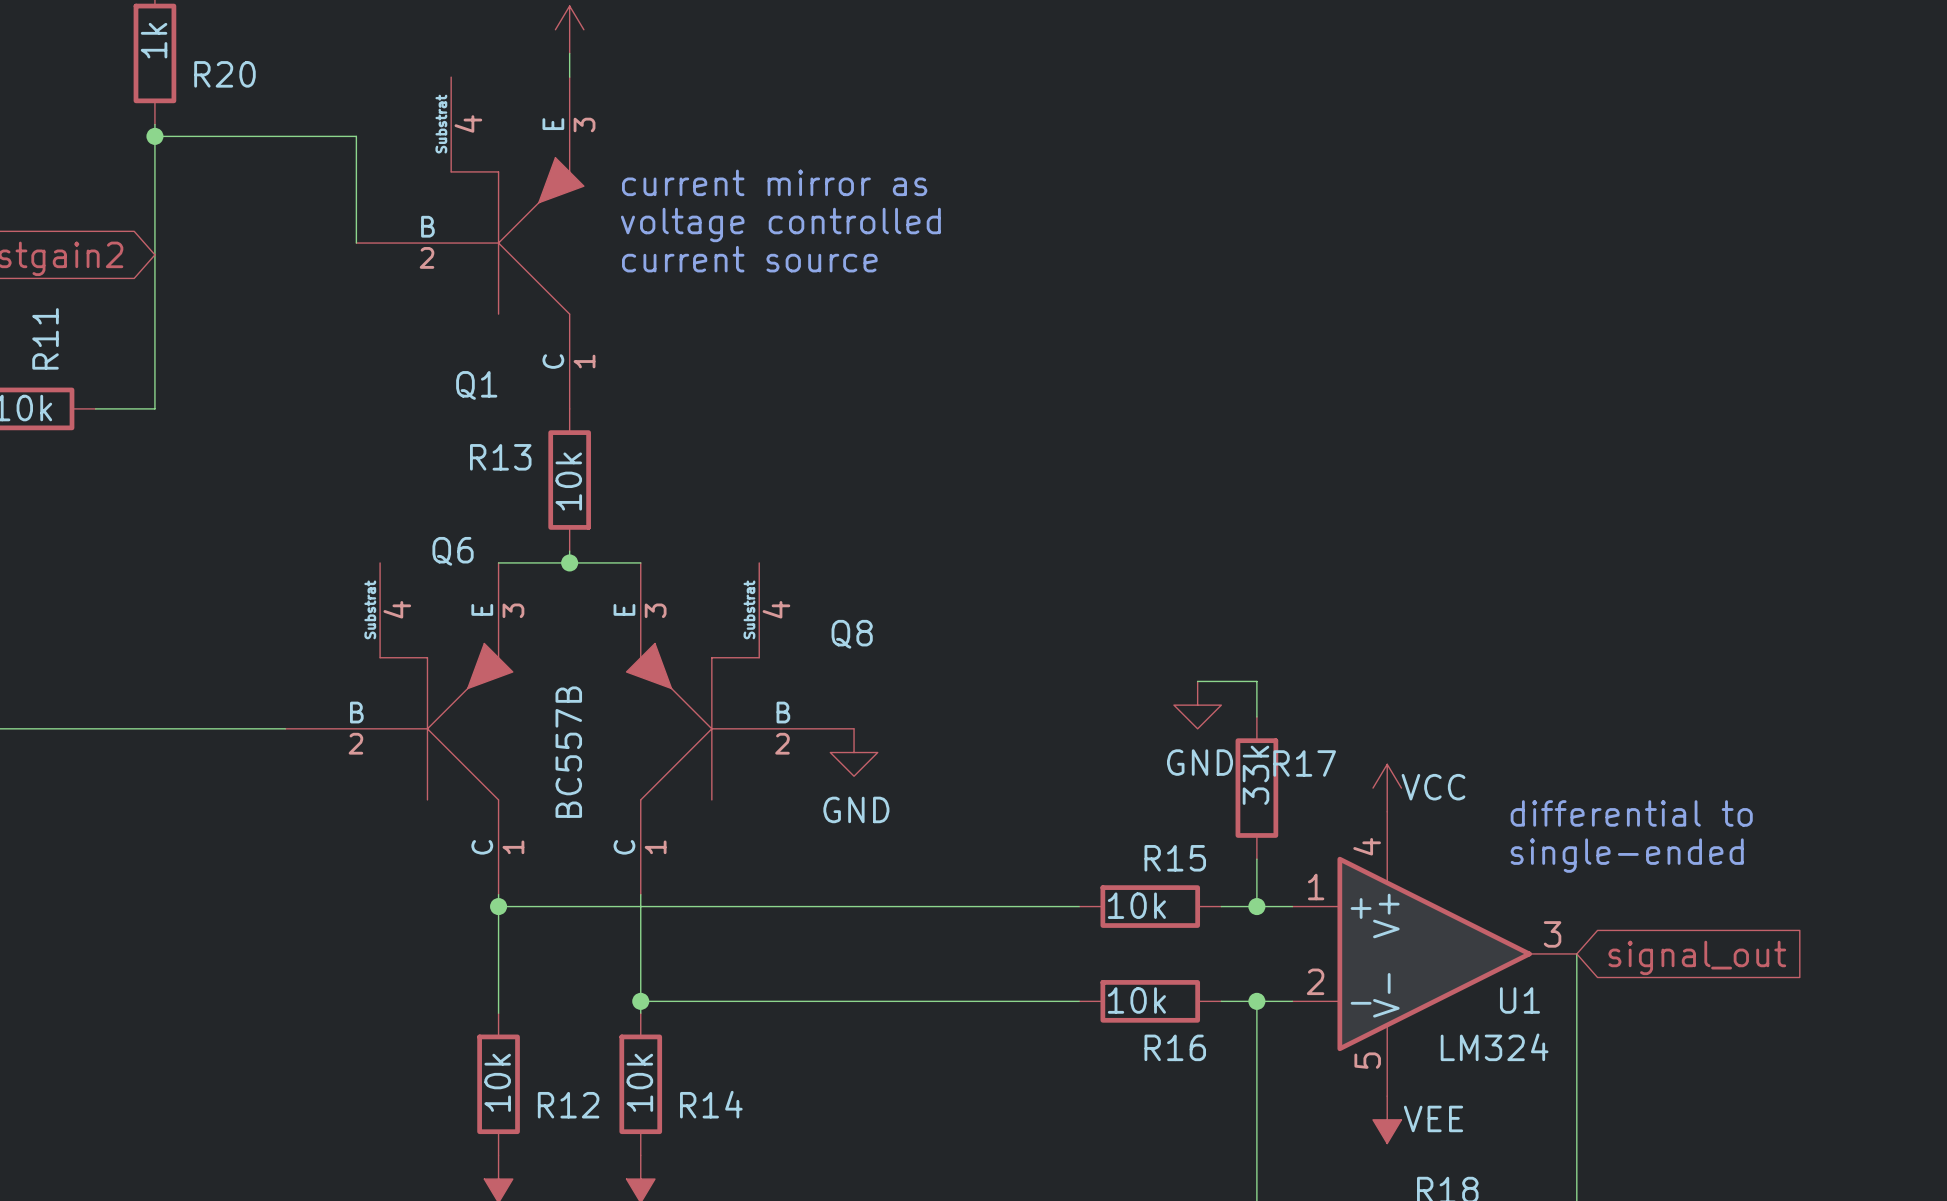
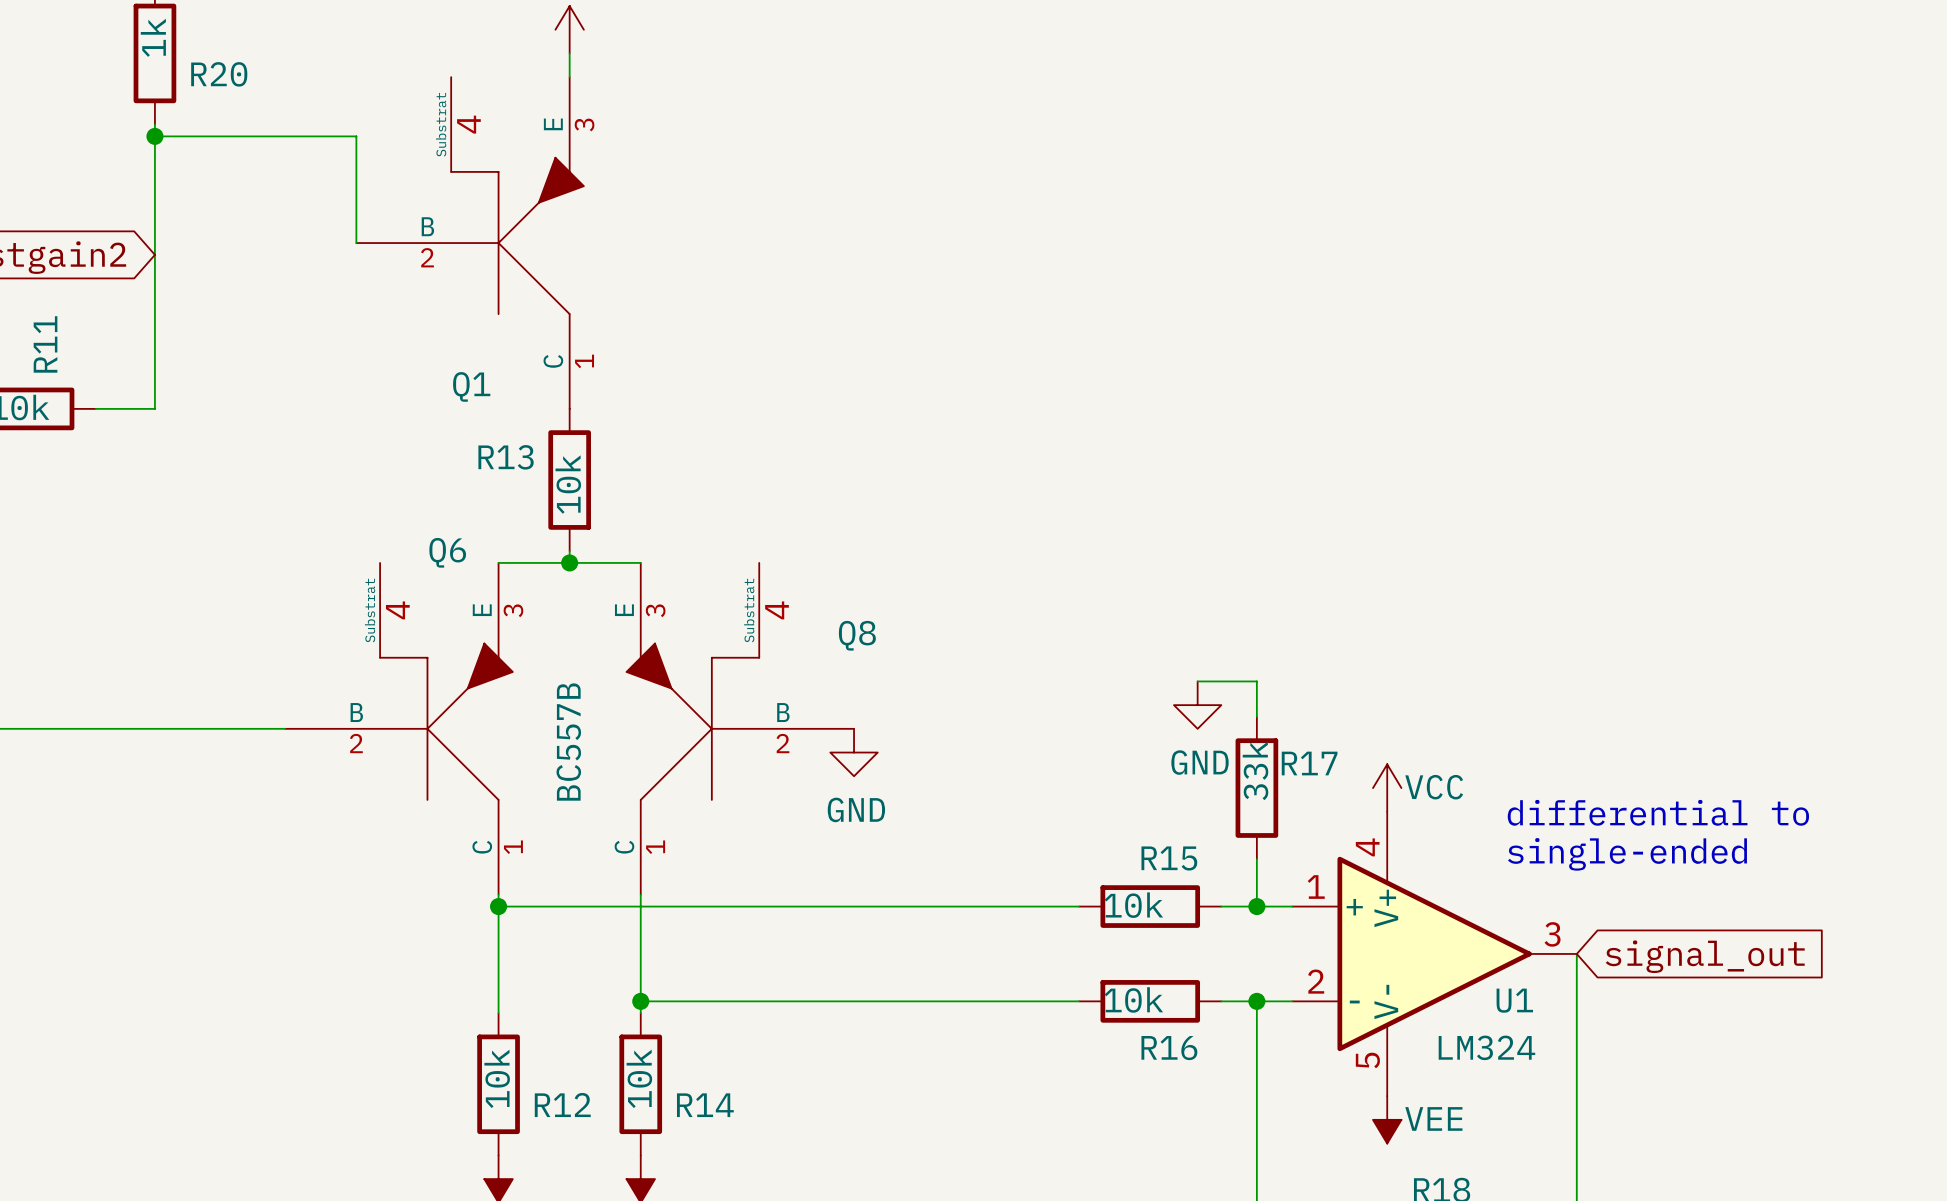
text: current mirror as (774, 182) -> none
text: voltage controlled (780, 224) -> none
text: current source (749, 259) -> none

